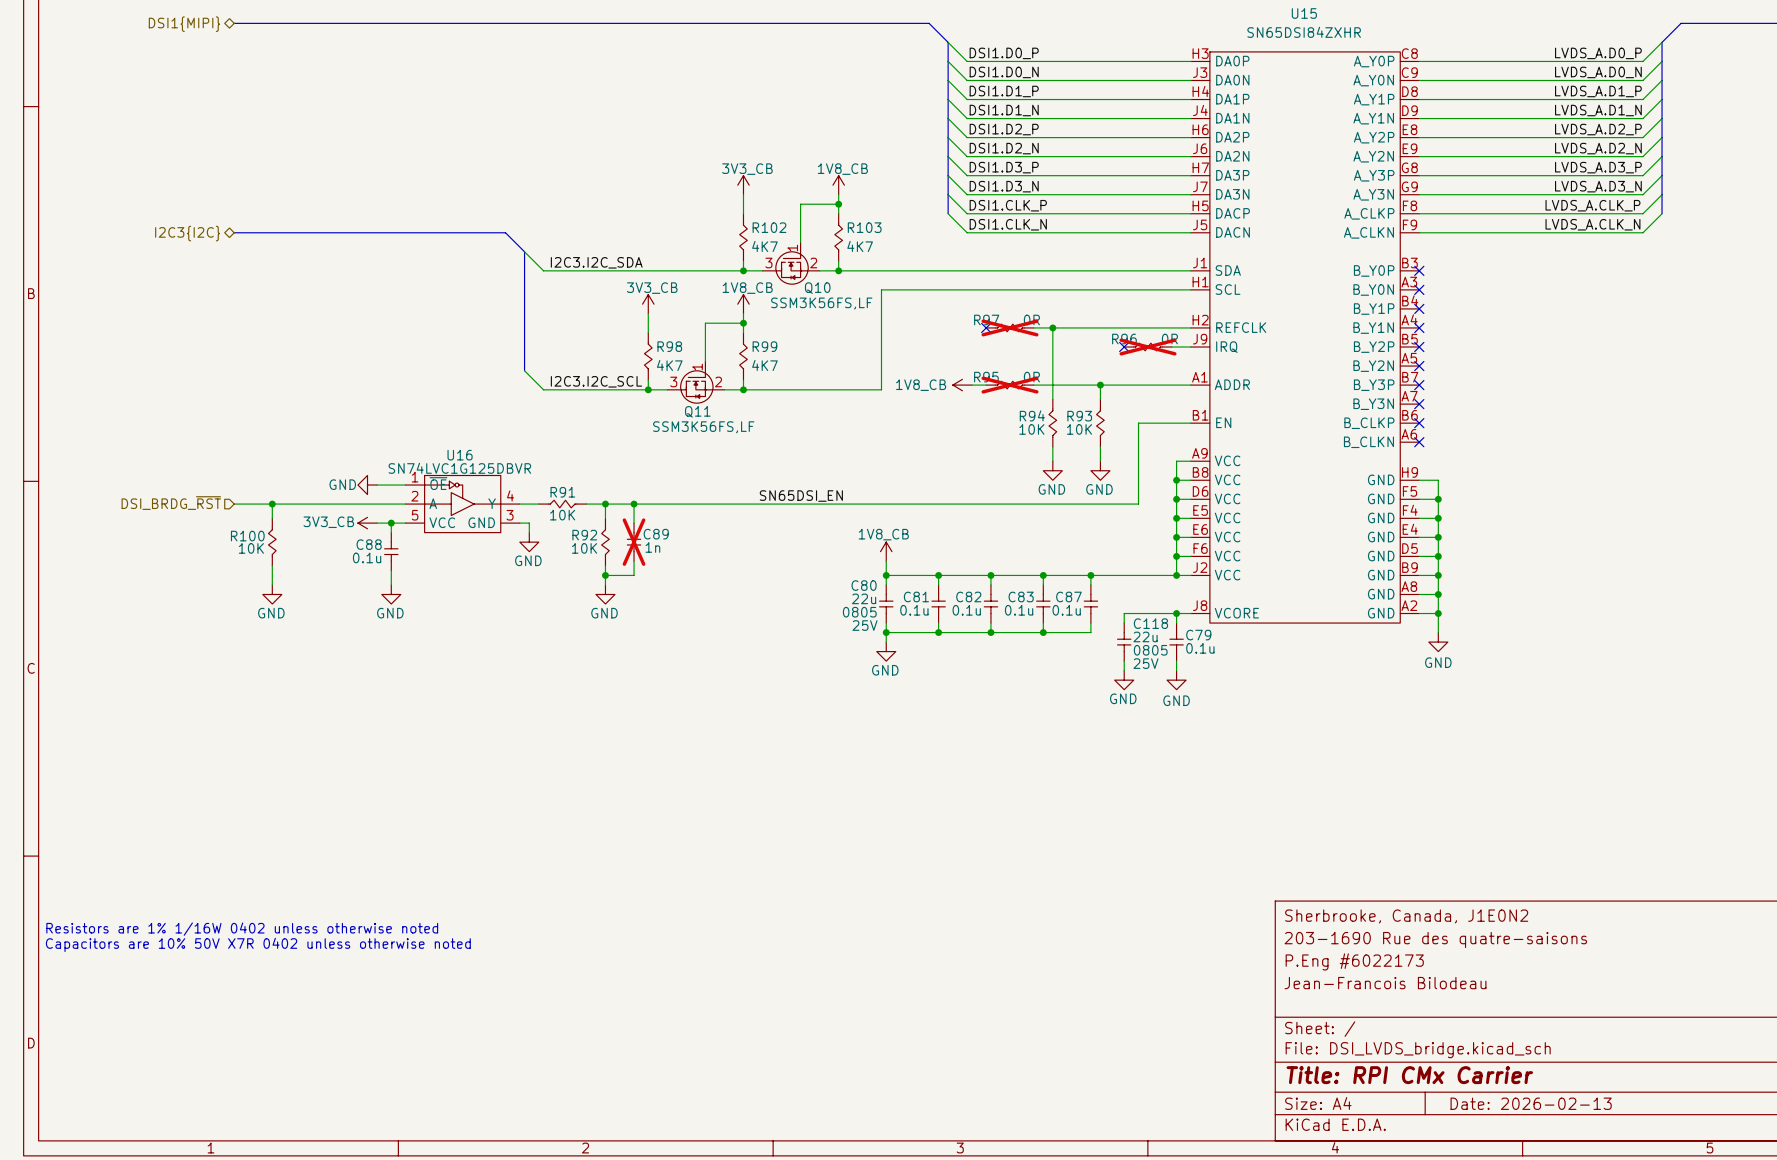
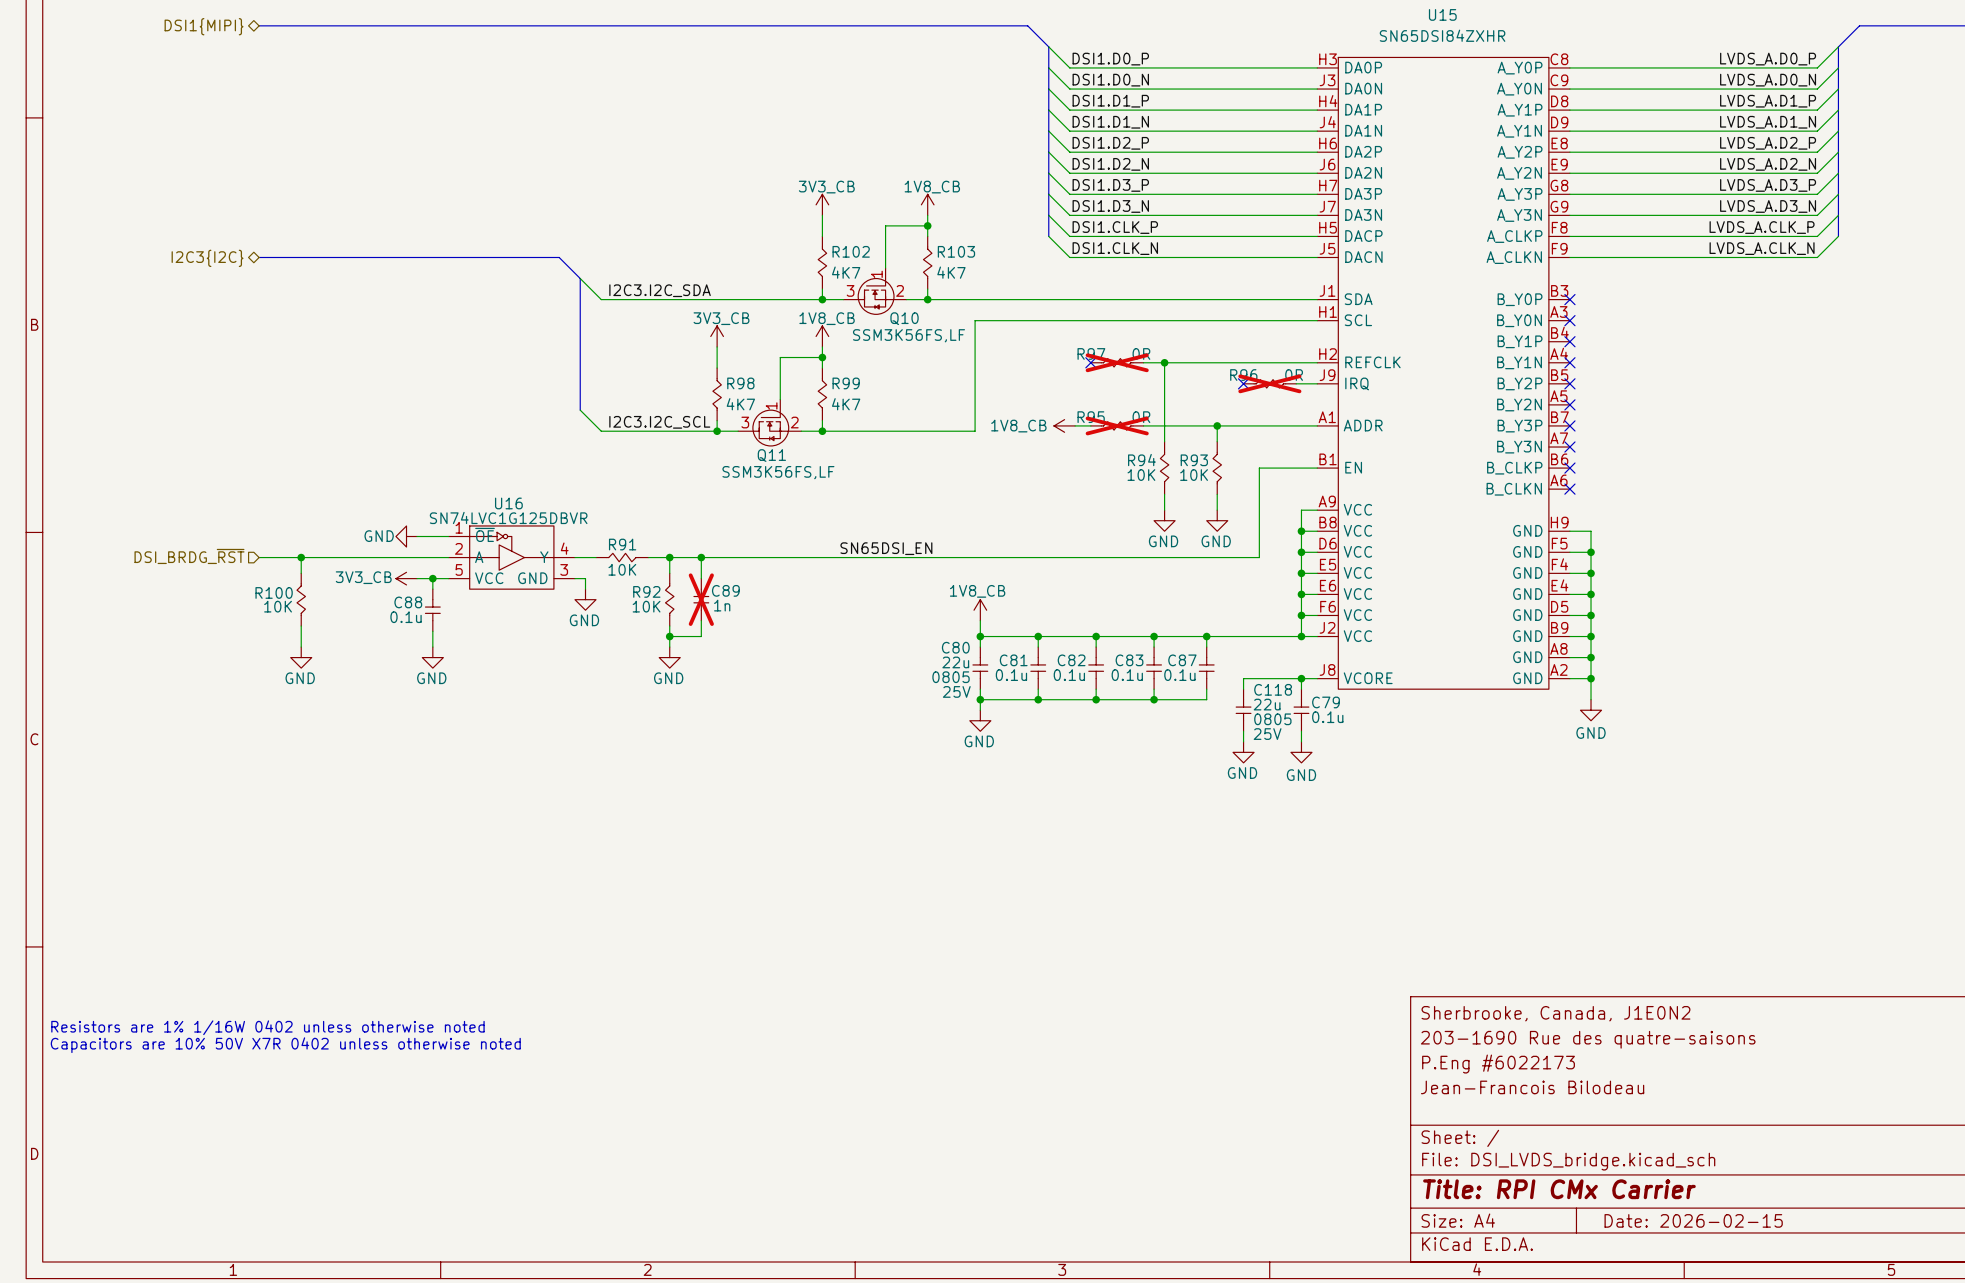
title block: Date: 2026-02-13 (1531, 1103) -> Date: 2026-02-15 (1693, 1220)

